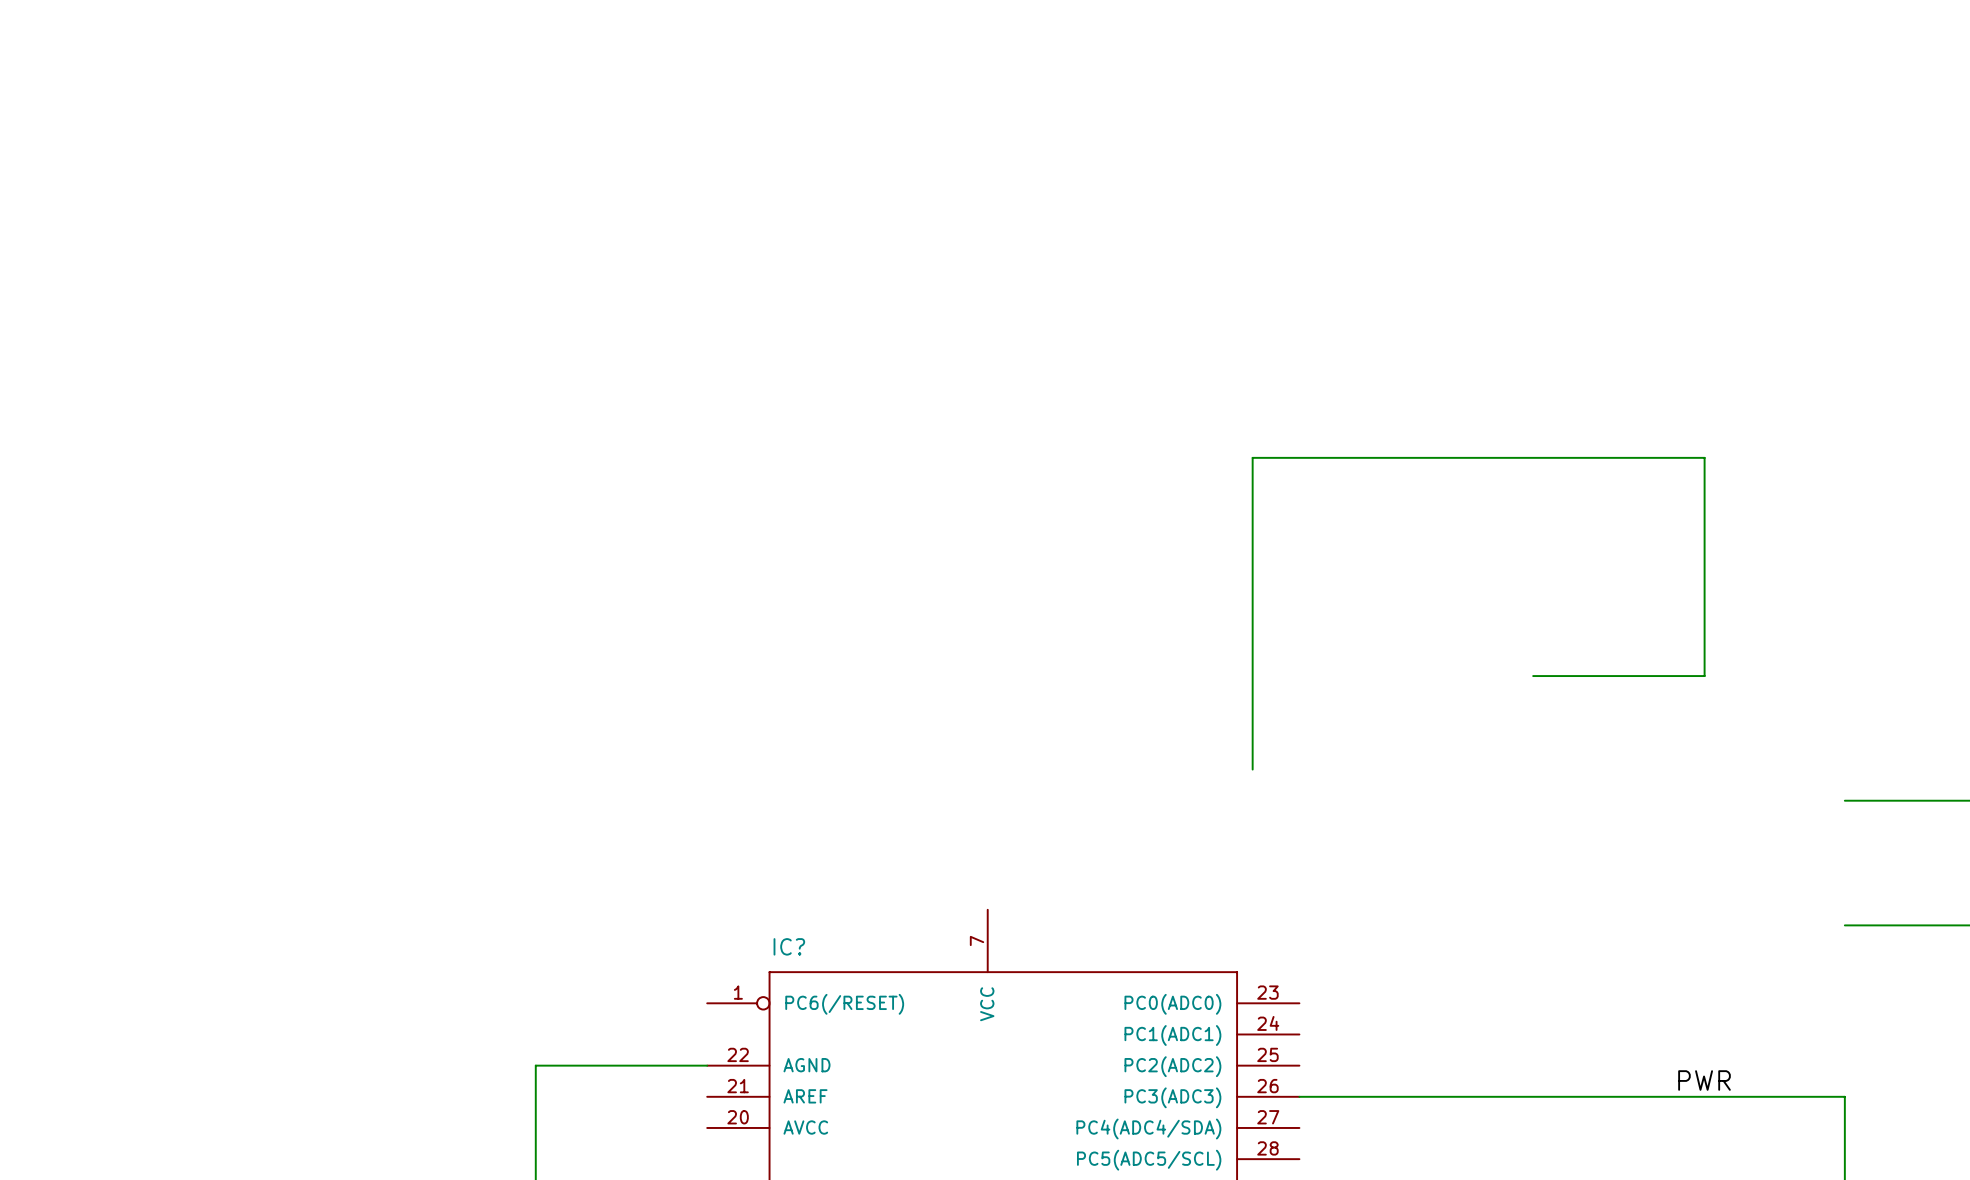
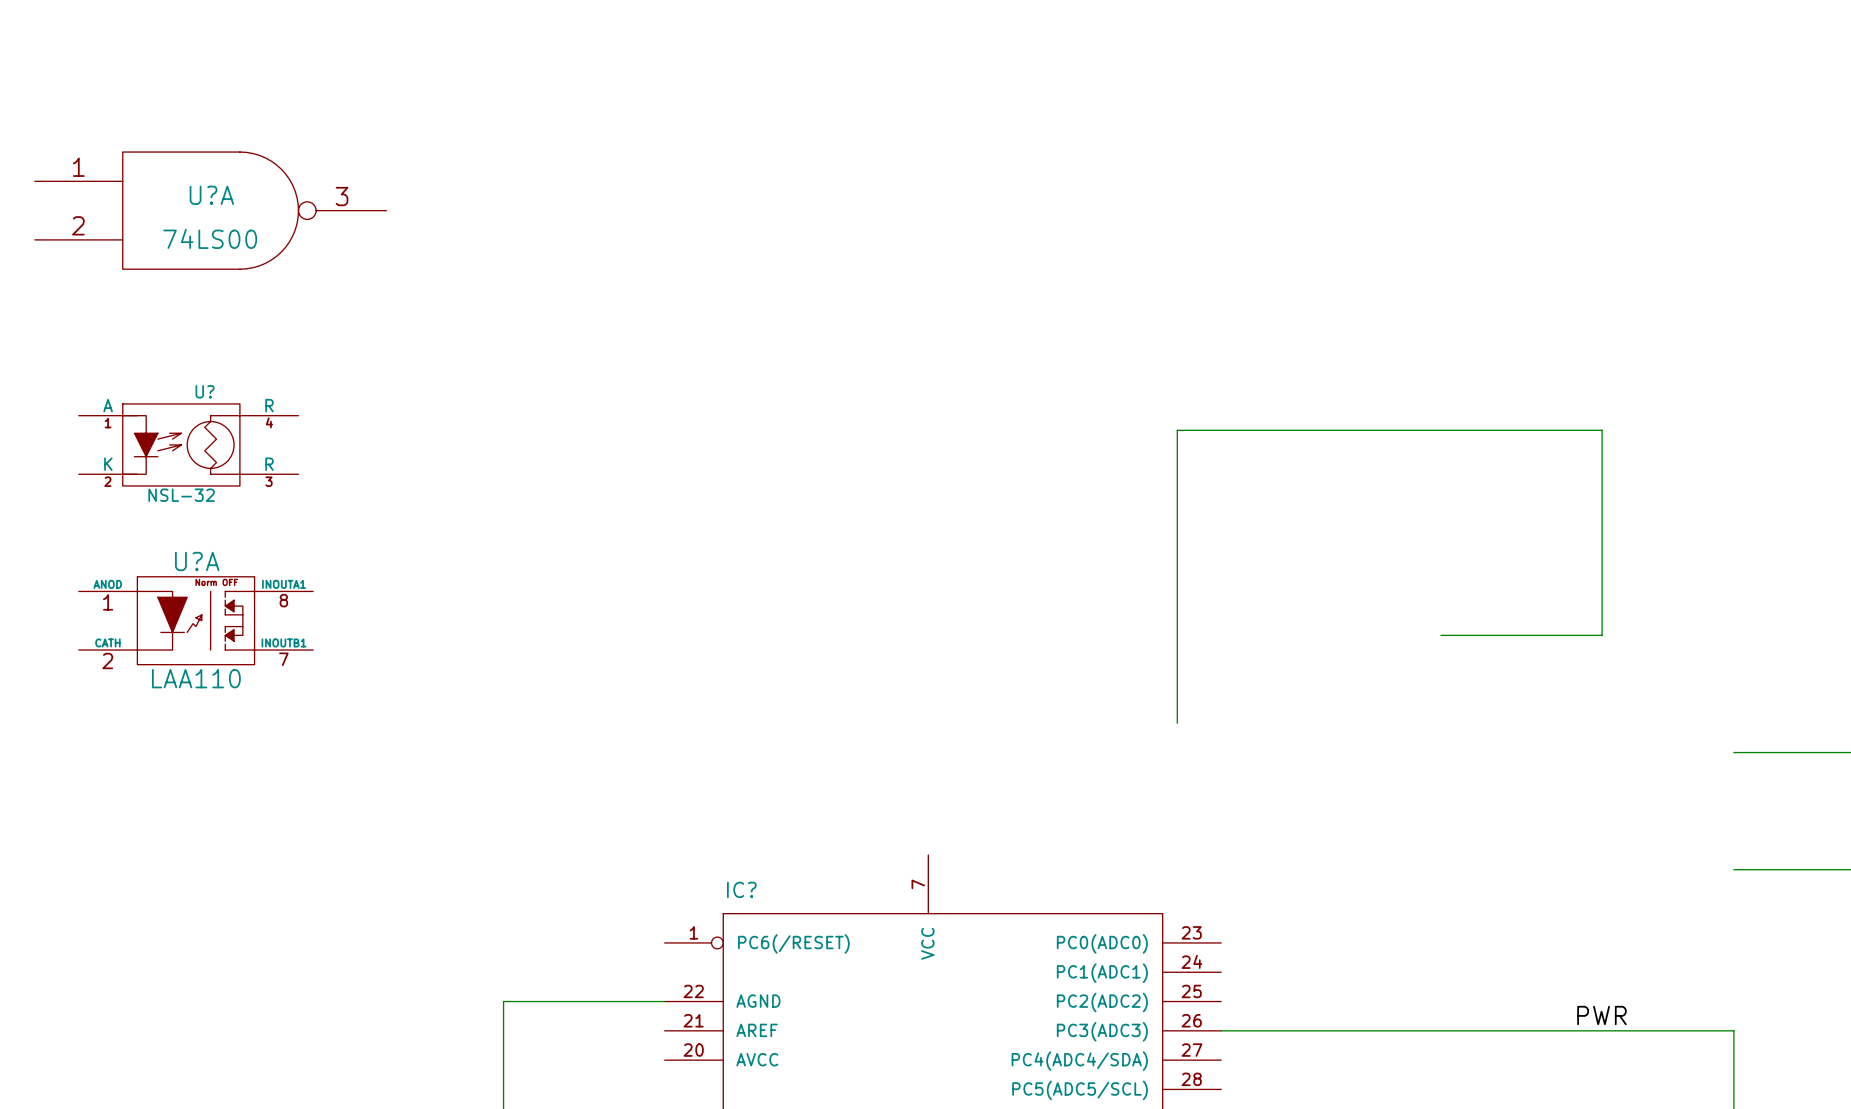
U?A: none -> 74LS00 (210, 210)
U?: none -> NSL-32 (188, 444)
U?A: none -> LAA110 (195, 620)

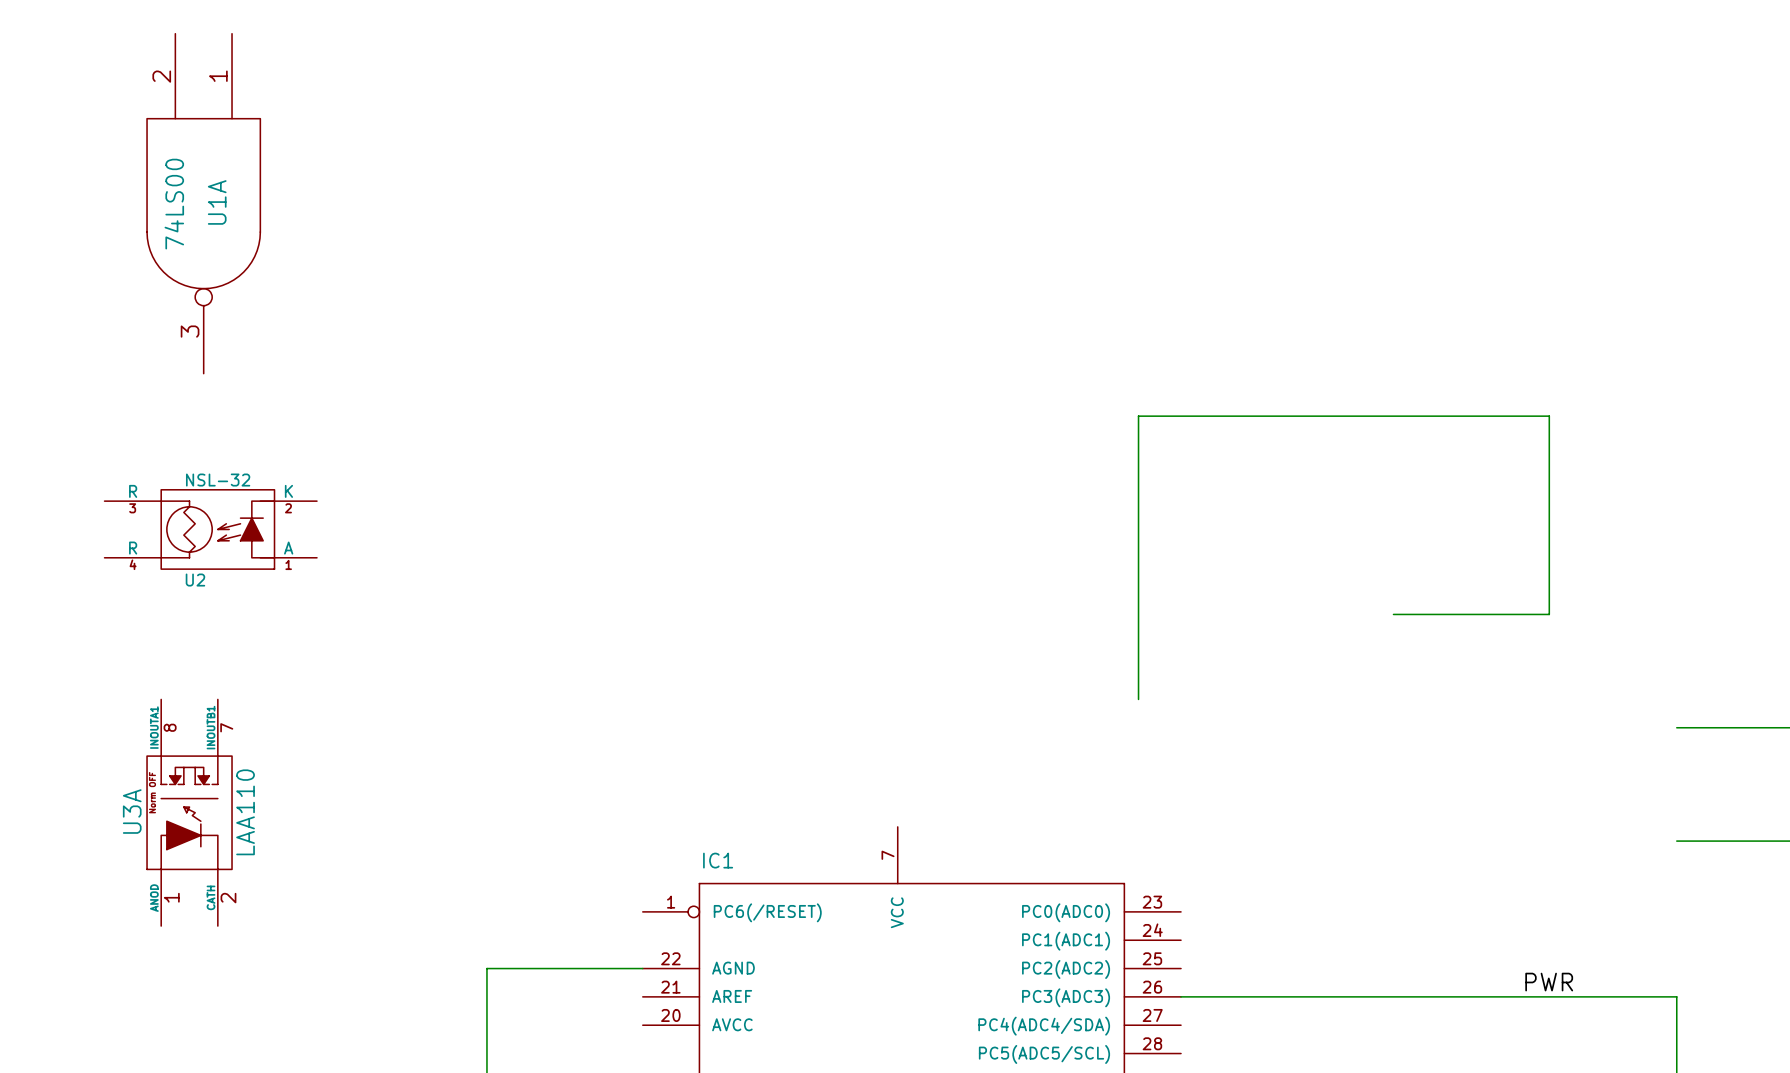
U?A: 74LS00 (210, 210) -> none
U1A: none -> 74LS00 (203, 203)
U?: NSL-32 (188, 444) -> none
U2: none -> NSL-32 (210, 529)
U?A: LAA110 (195, 620) -> none
U3A: none -> LAA110 (189, 812)
IC? name: IC? (741, 889) -> IC1 (718, 860)

